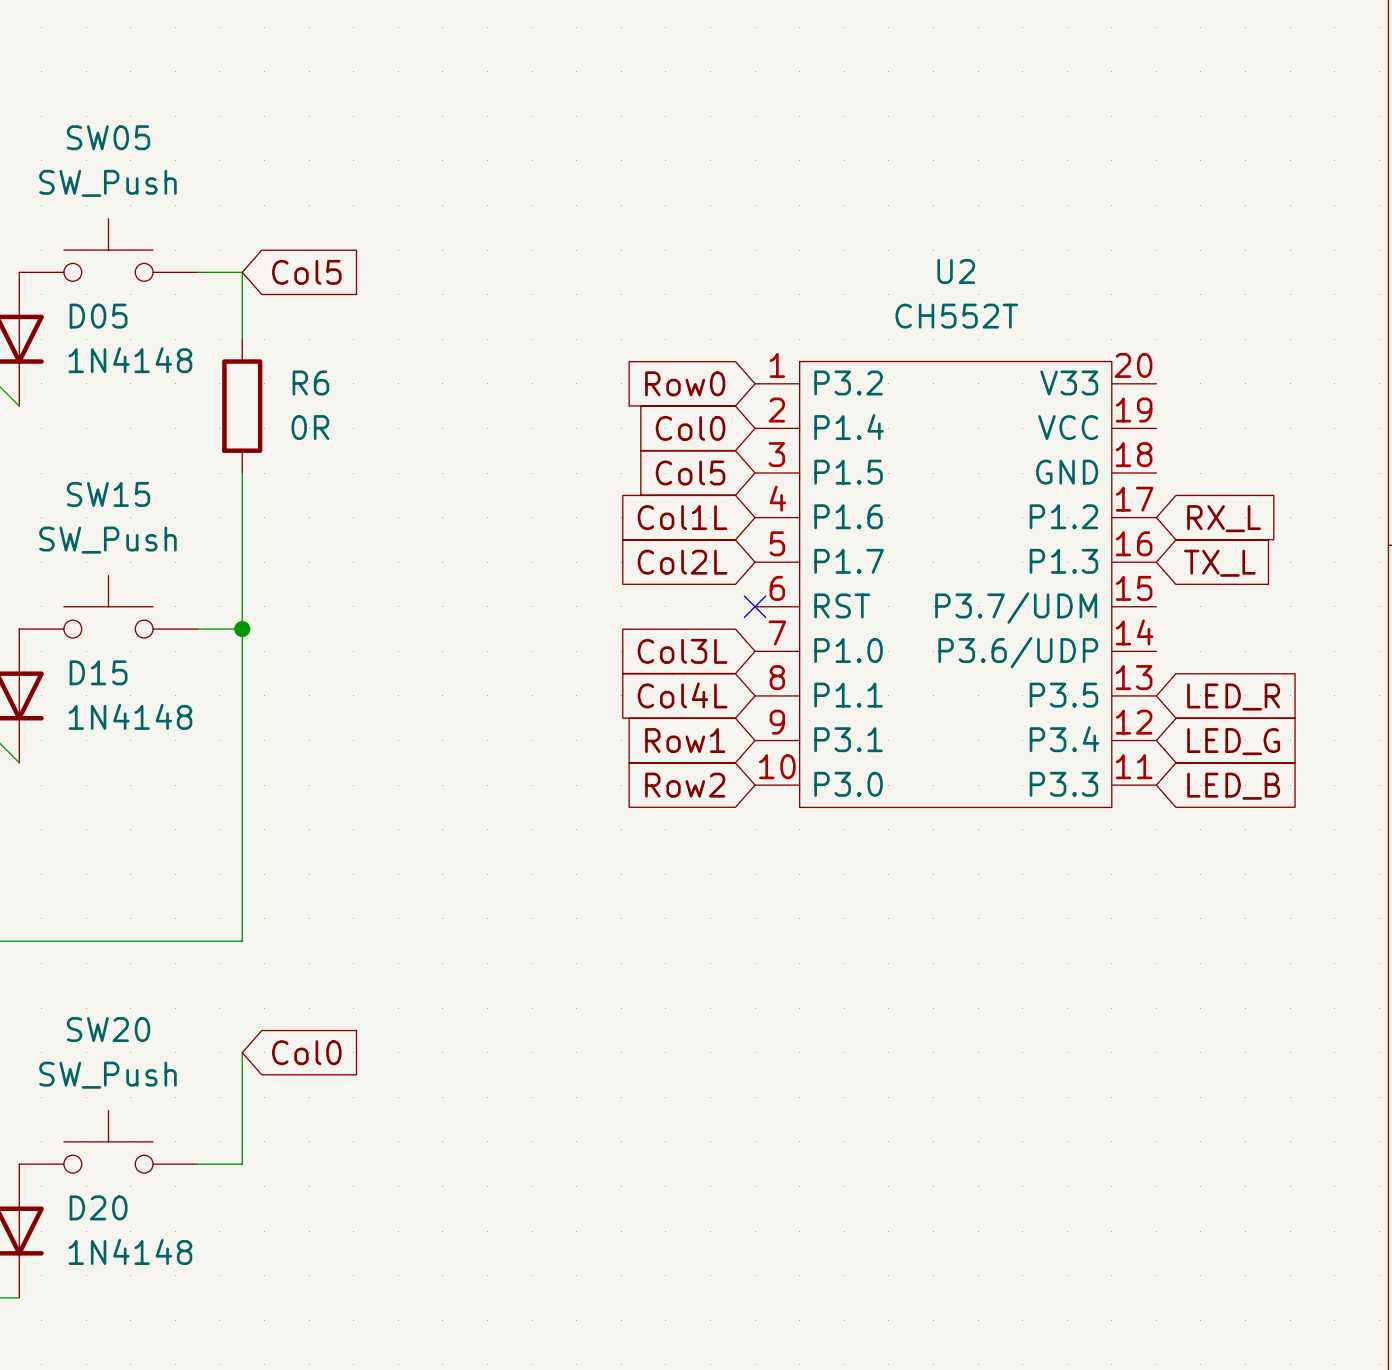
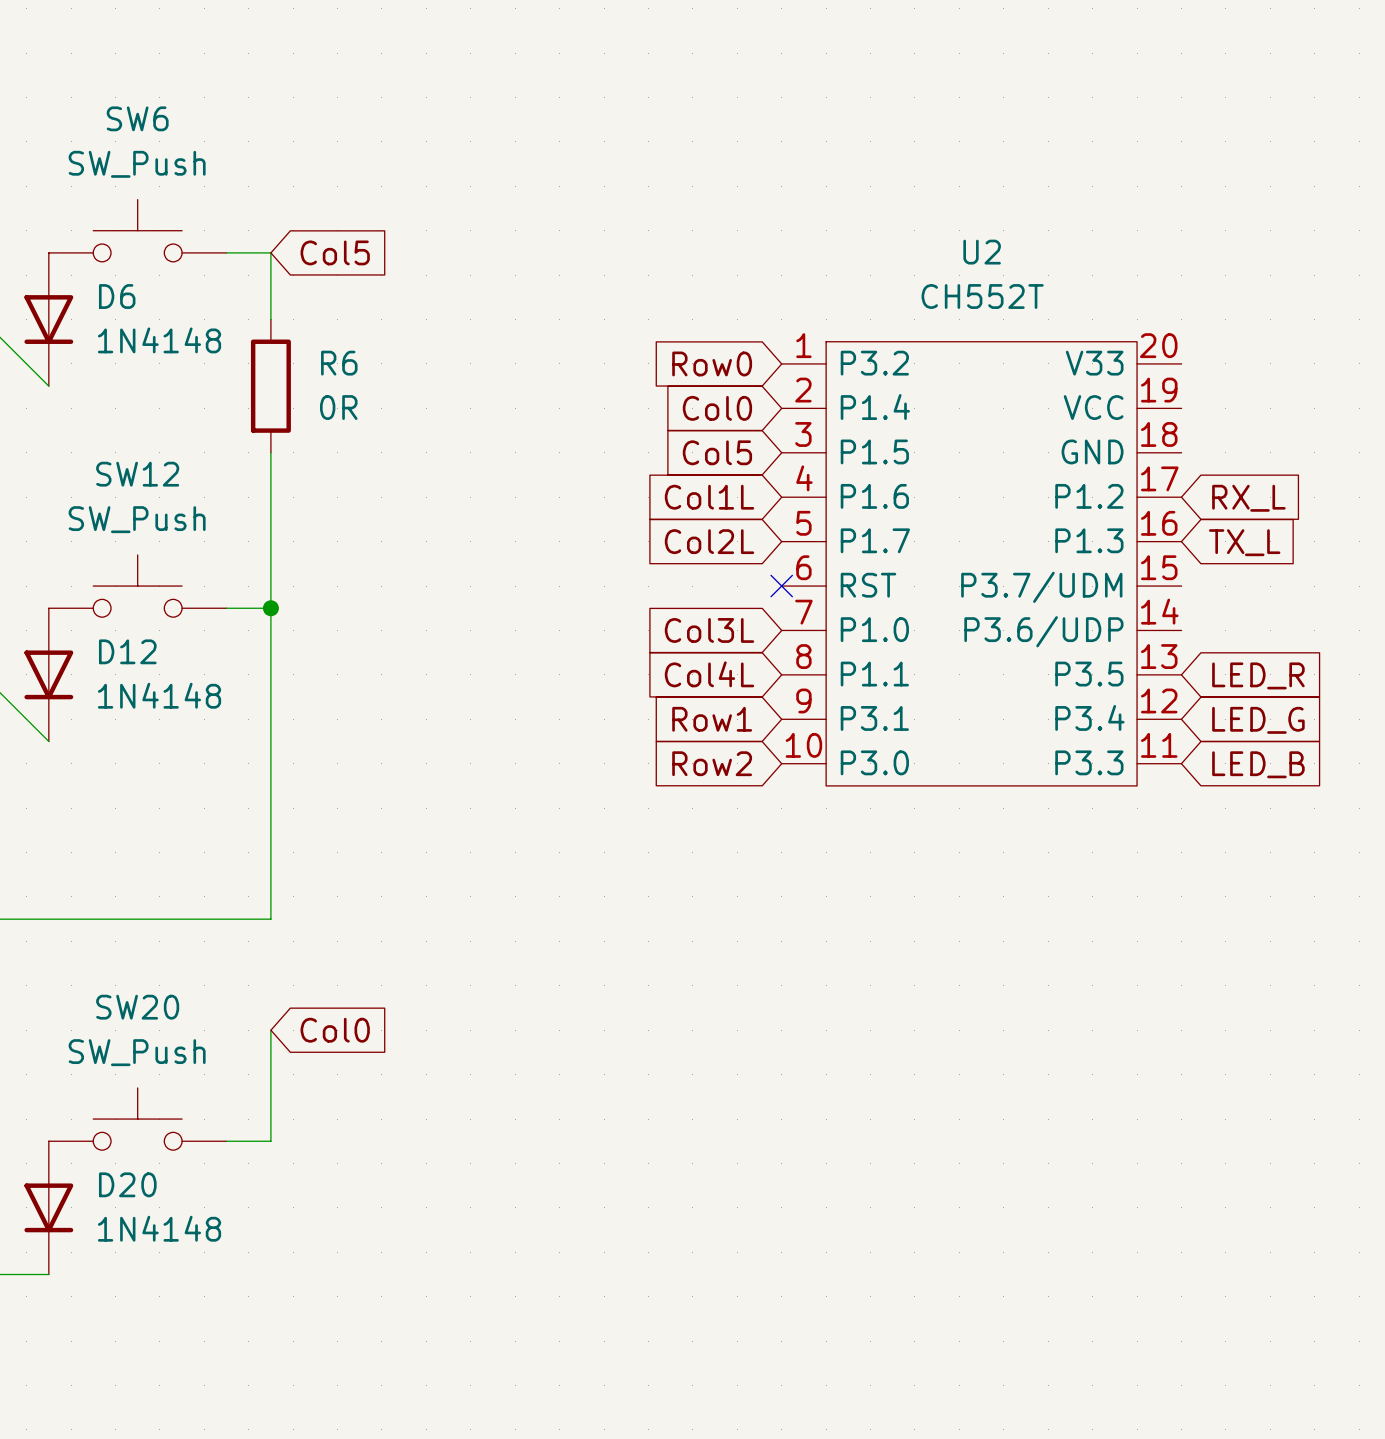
SW05 name: SW05 (108, 137) -> SW6 (137, 118)
D05 name: D05 (98, 316) -> D6 (117, 296)
SW15 name: SW15 (108, 494) -> SW12 (137, 474)
D15 name: D15 (98, 672) -> D12 (127, 651)

